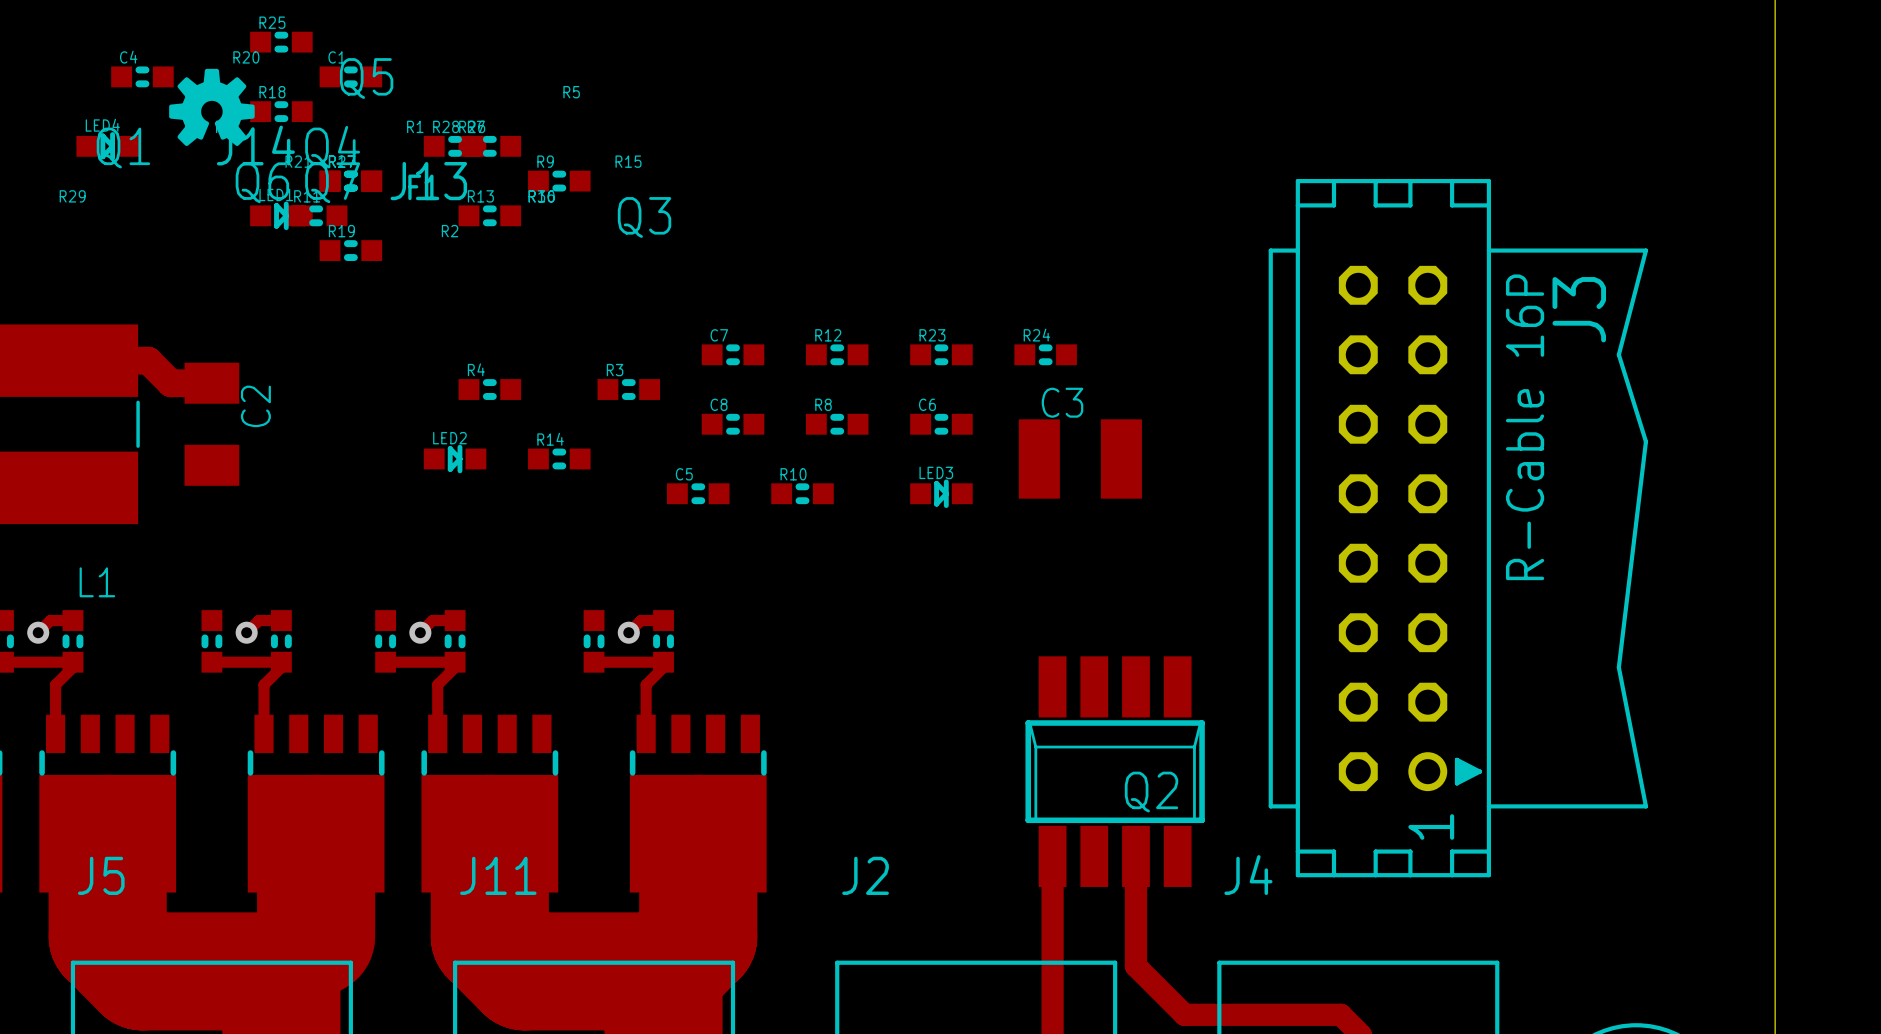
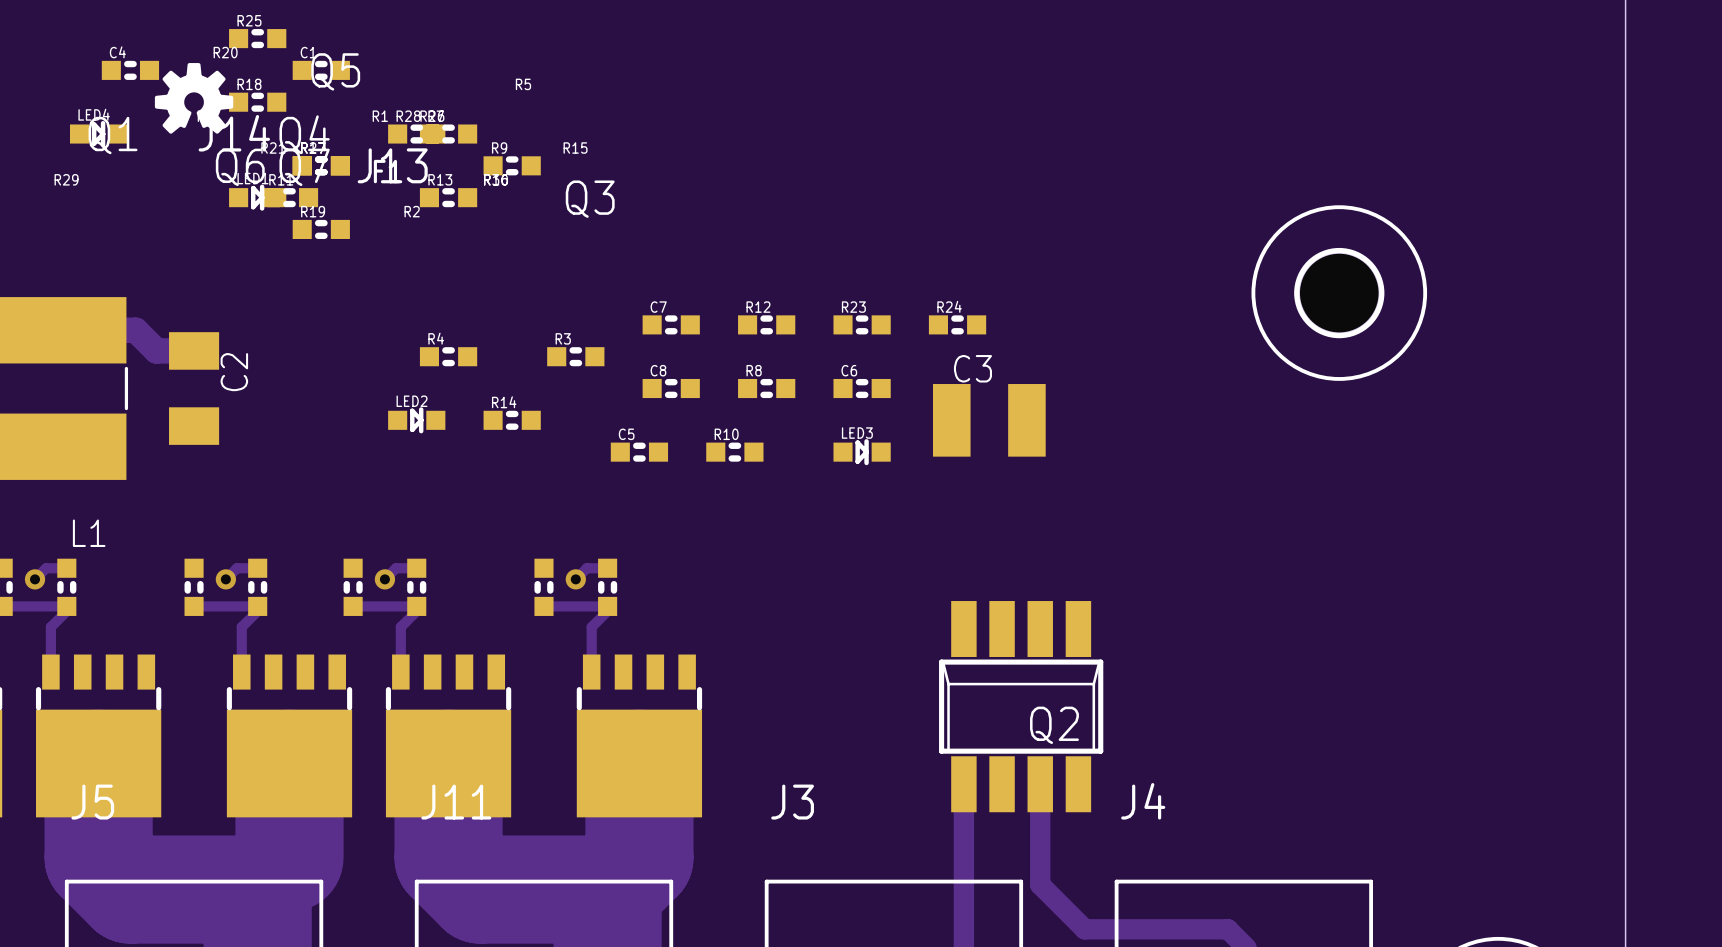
part: none -> (1339, 293)
J3: (1458, 528) -> none
J2 name: J2 (865, 875) -> J3 (792, 802)

